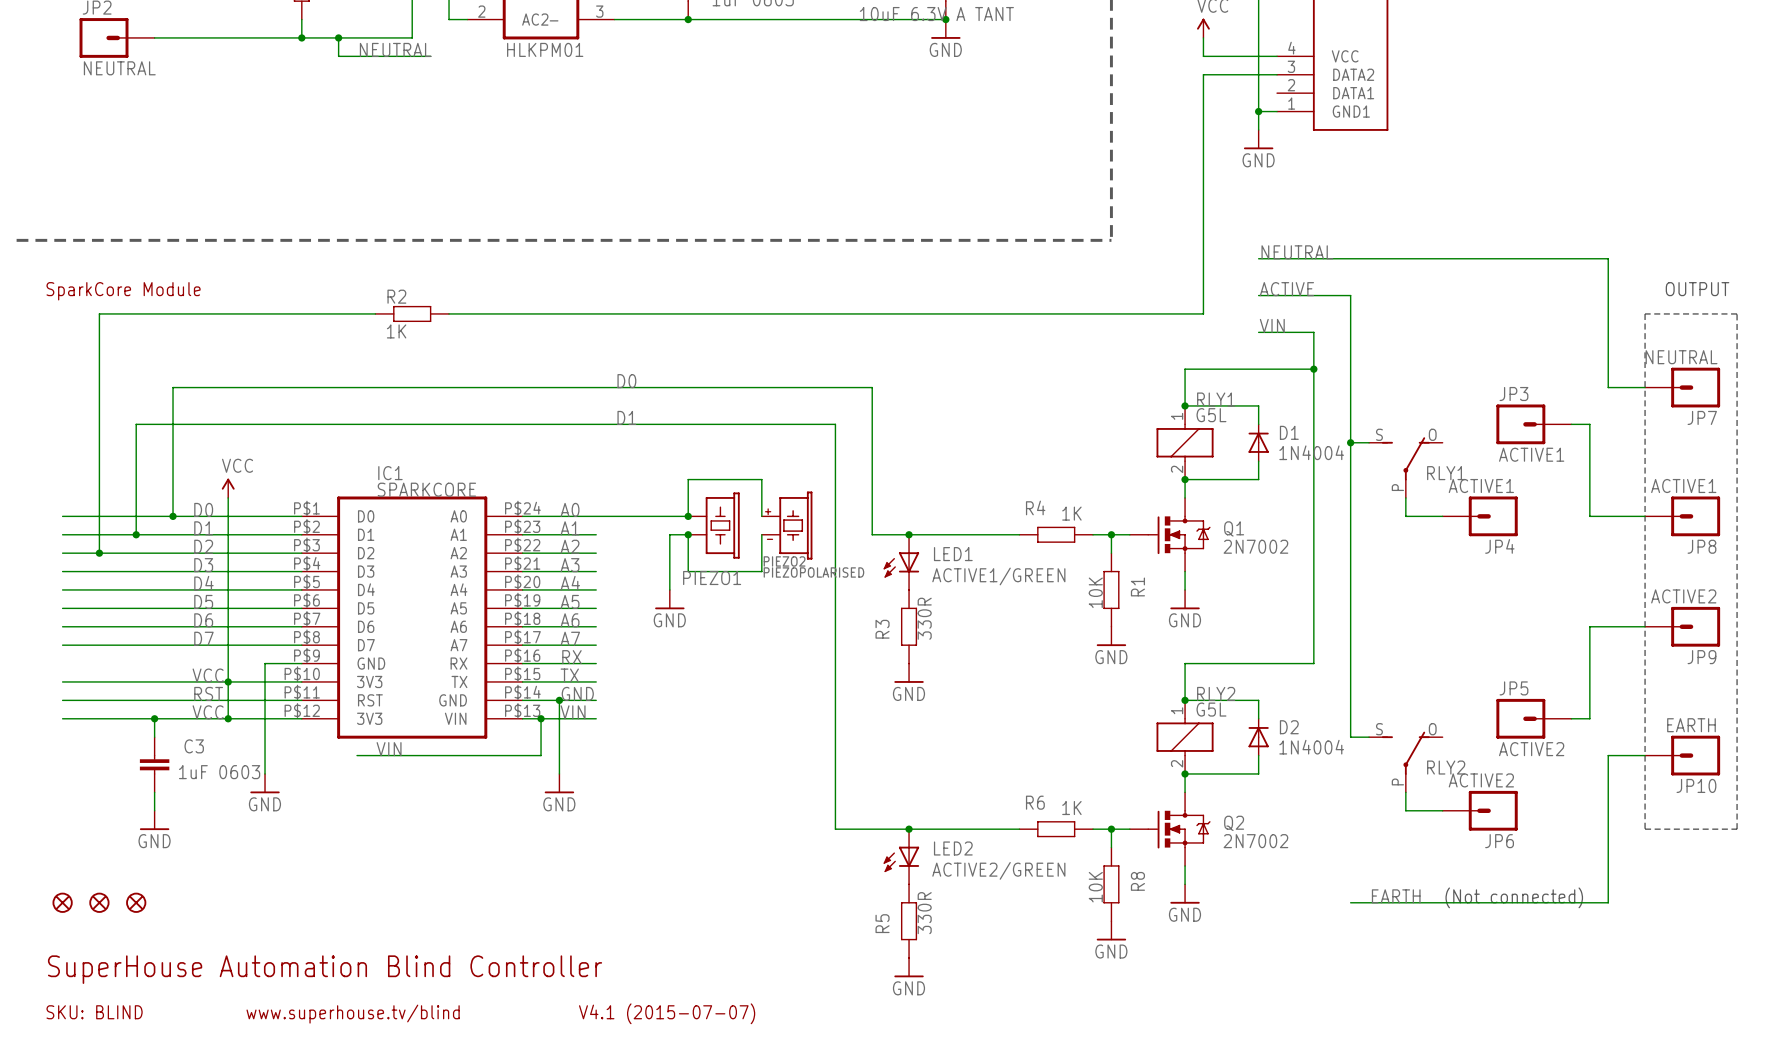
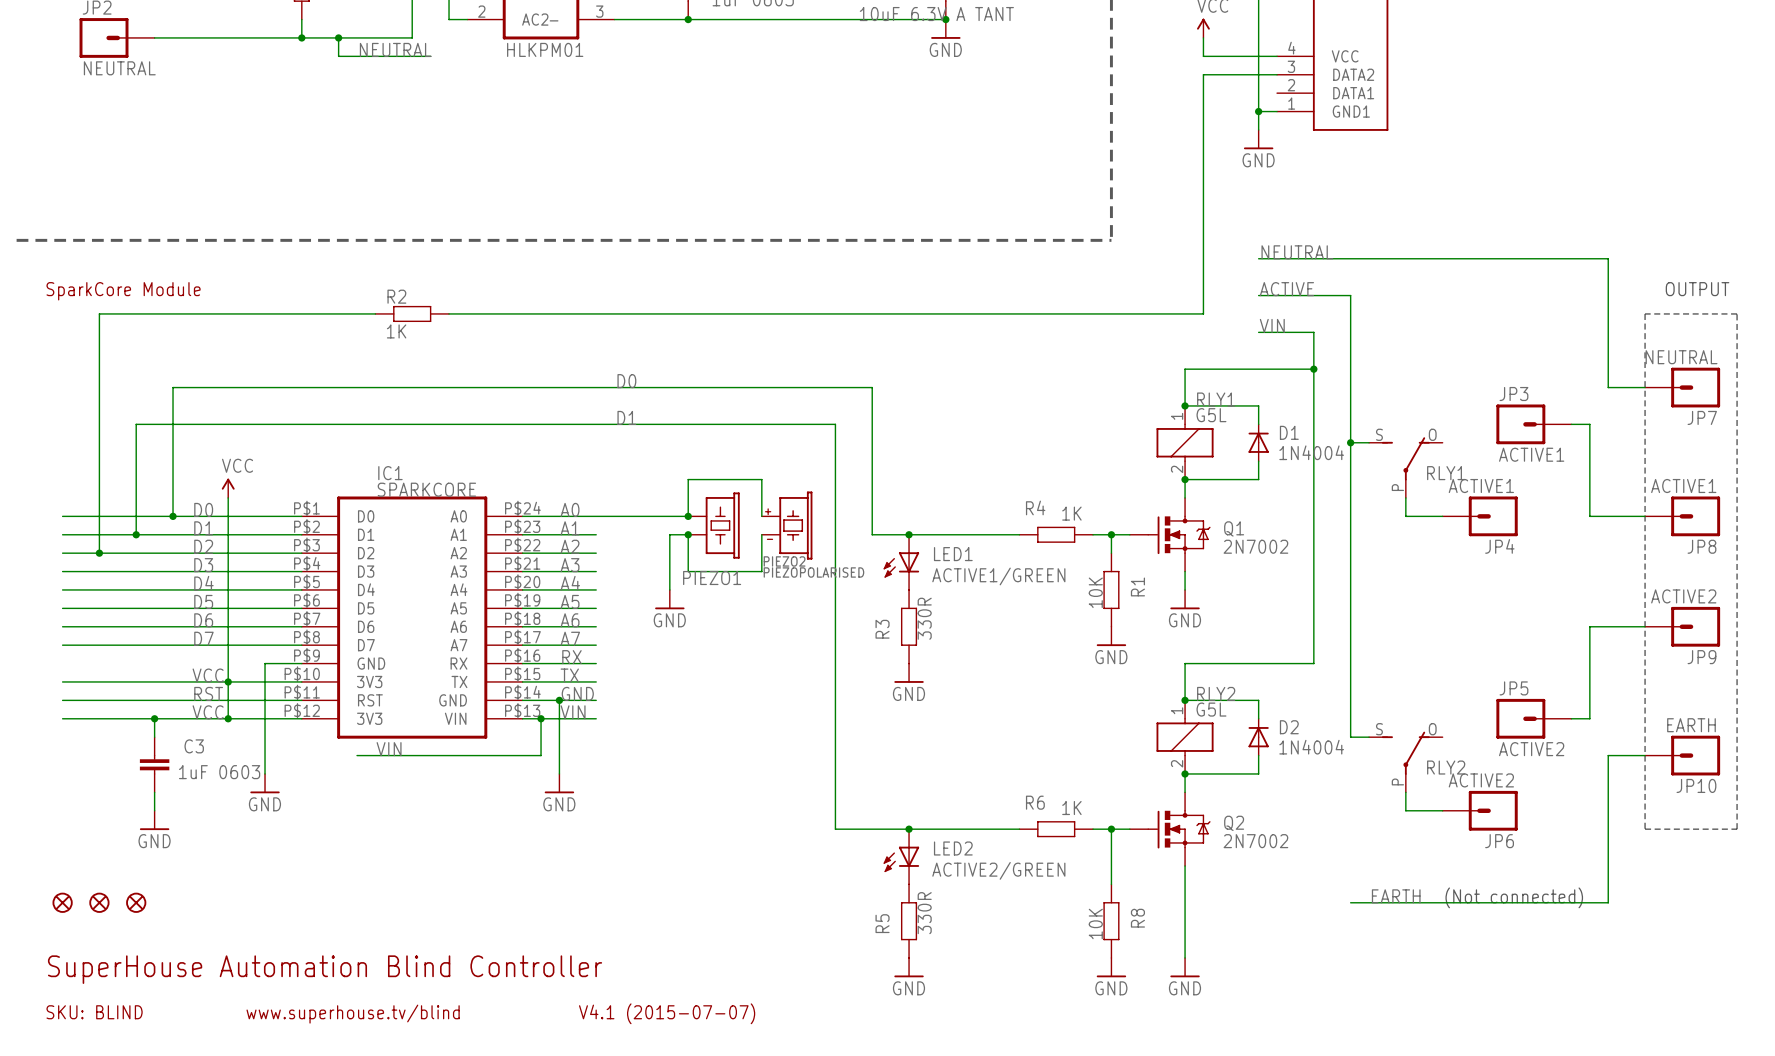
wire: none -> (1111, 847) (1111, 884)
R8 position: (1111, 884) -> (1111, 921)
wire: none -> (1185, 884) (1185, 957)
power symbol: GND (1185, 894) -> none
power symbol position: GND (1111, 930) -> GND (1111, 967)
power symbol: none -> GND (1185, 967)

